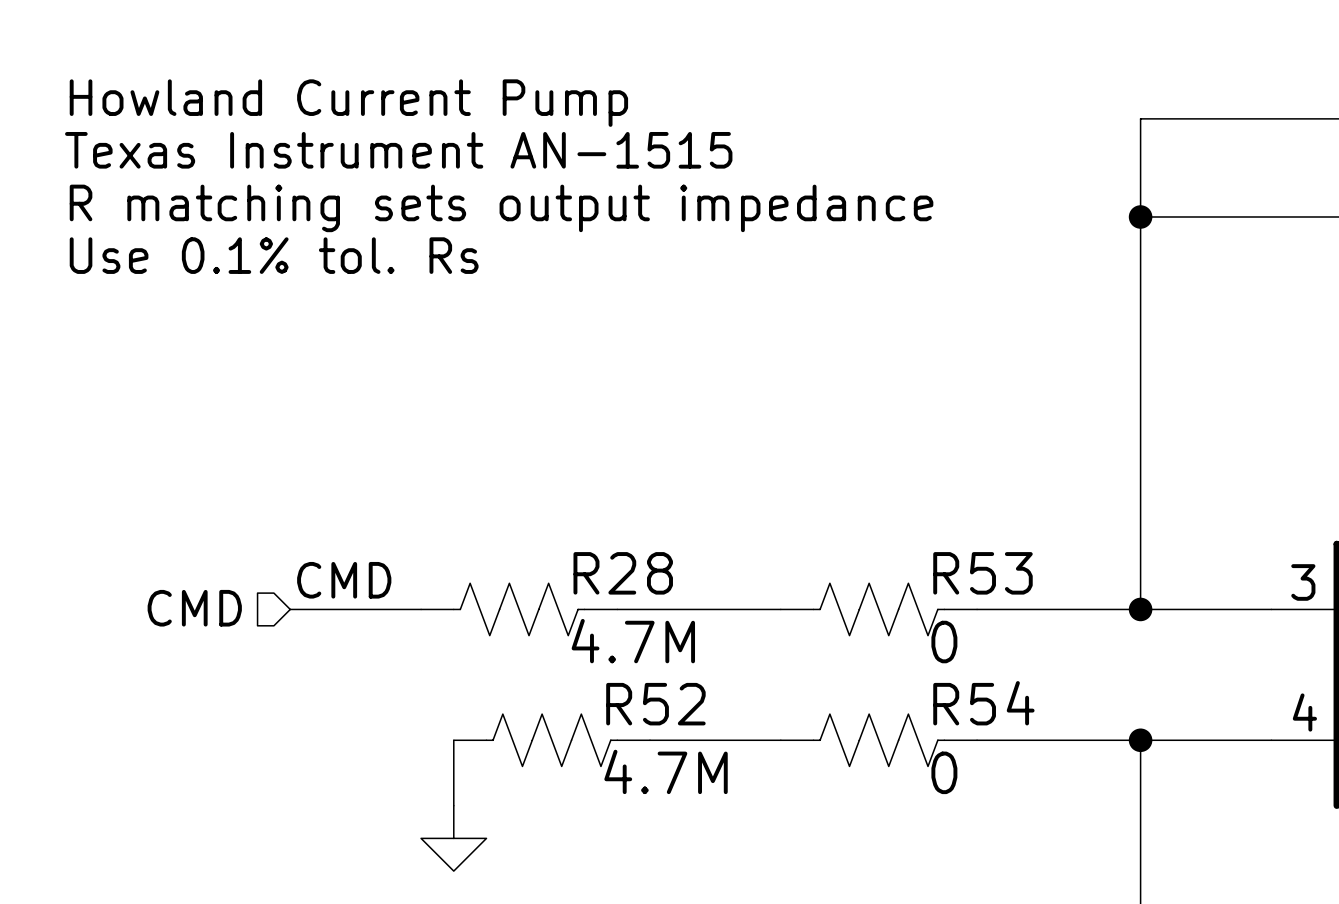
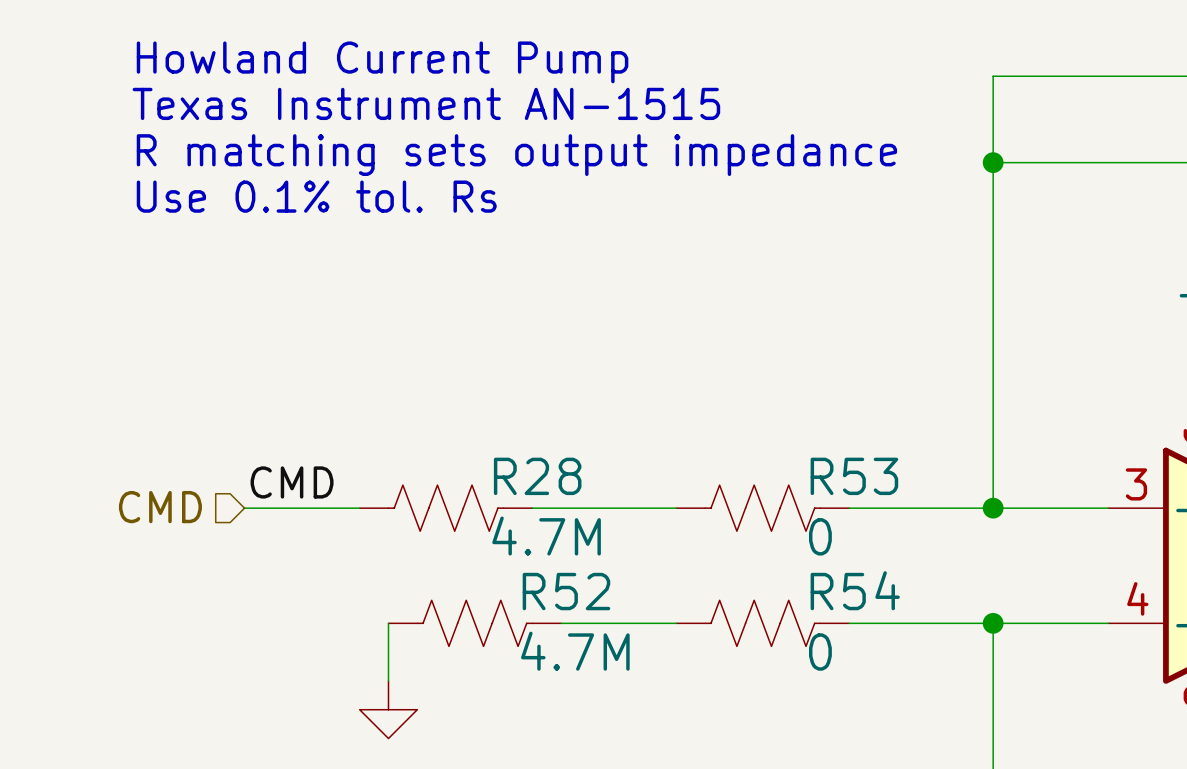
text position: Howland Current Pump (348, 103) -> Howland Current Pump (382, 62)
text position: Texas Instrument AN-1515 (398, 150) -> Texas Instrument AN-1515 (426, 103)
text position: R matching sets output impedance (501, 208) -> R matching sets output impedance (516, 155)
text position: Use 0.1% tol. Rs (274, 255) -> Use 0.1% tol. Rs (316, 196)

